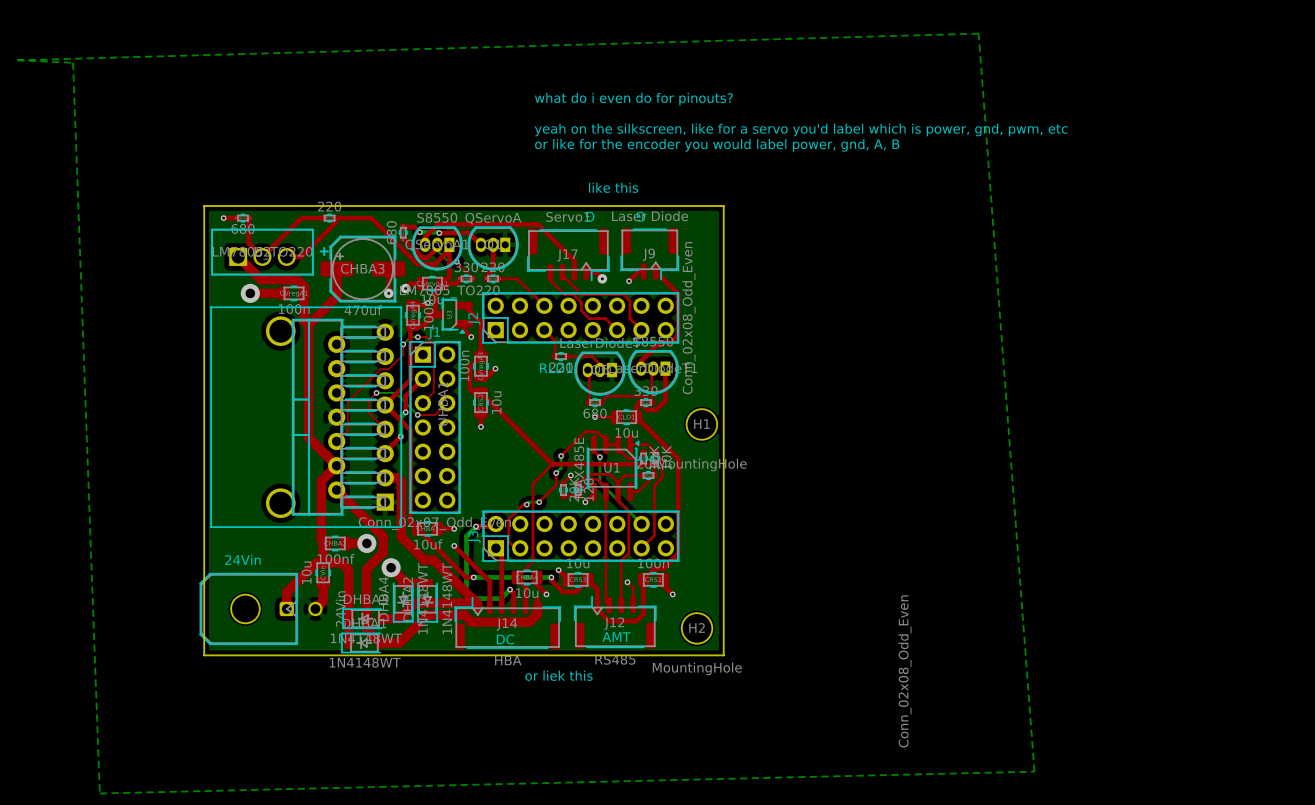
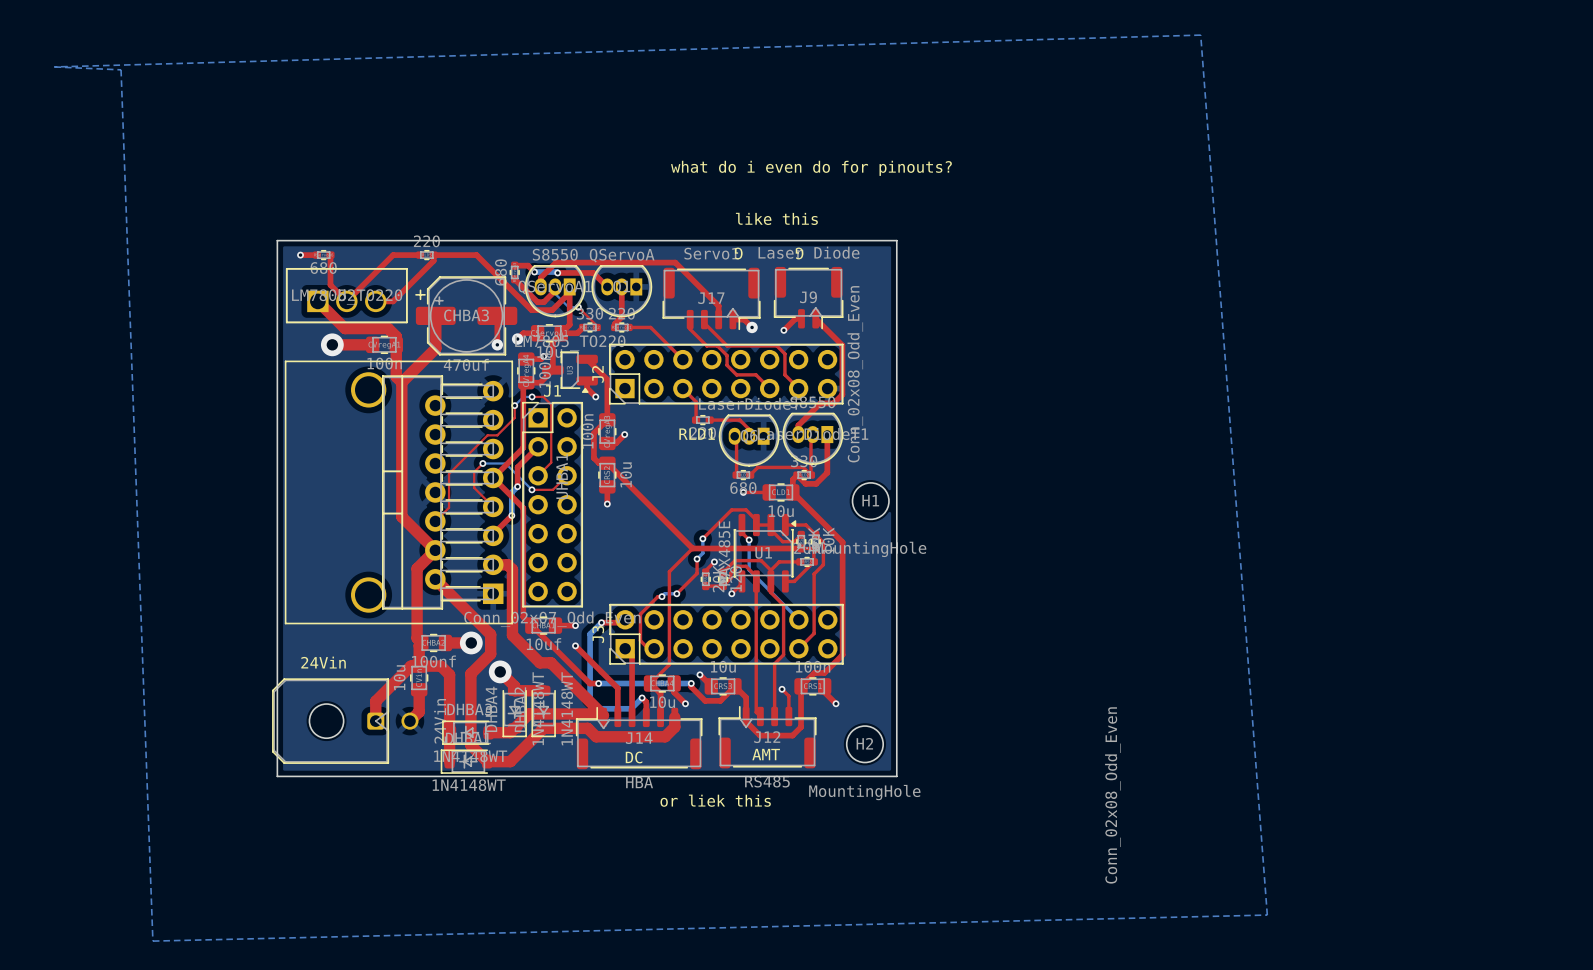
text: what do i even do for pinouts? (633, 99) -> none
text: yeah on the silkscreen, like for a servo you'd label which is power, gnd, pwm, etc (801, 129) -> none
text: or like for the encoder you would label power, gnd, A, B (717, 145) -> what do i even do for pinouts? (811, 168)

